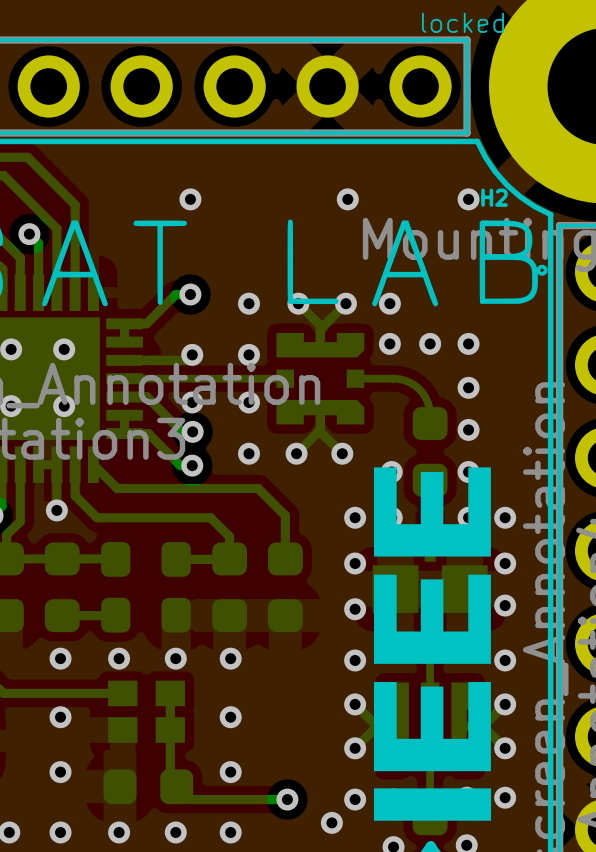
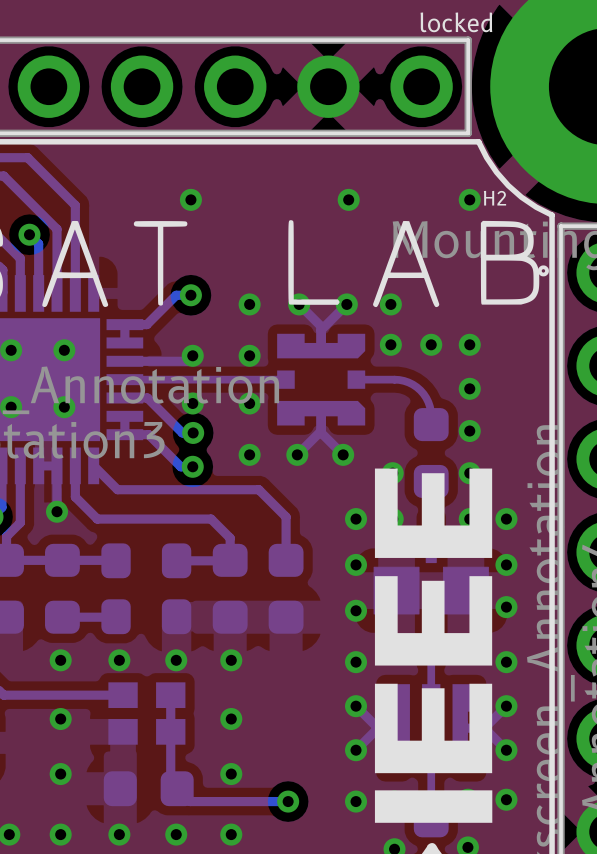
via: (331, 822) -> none

